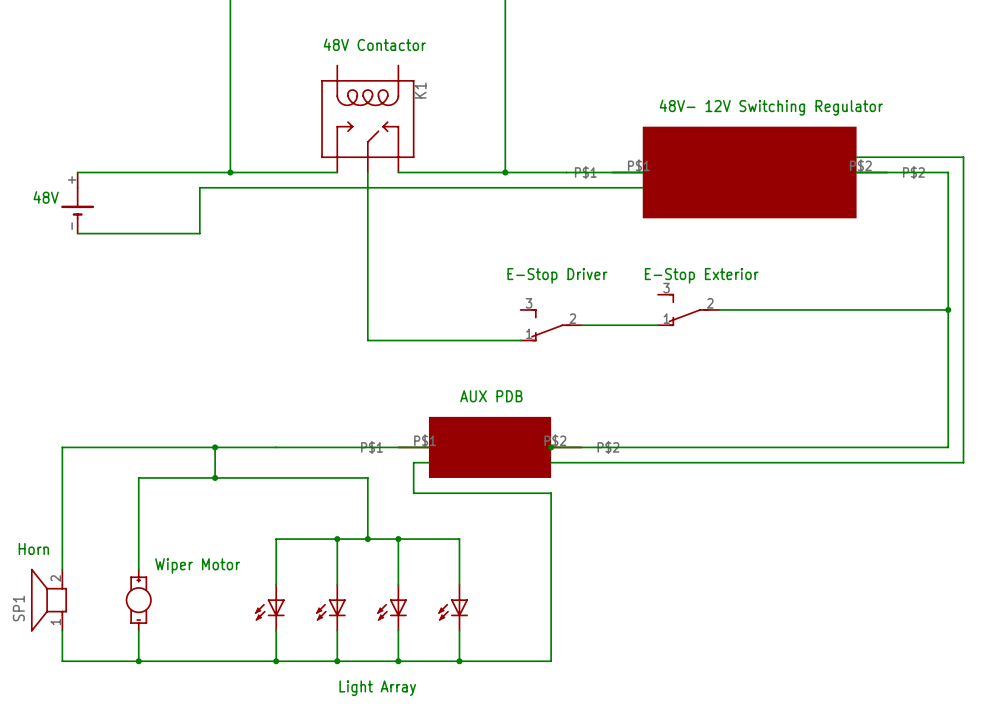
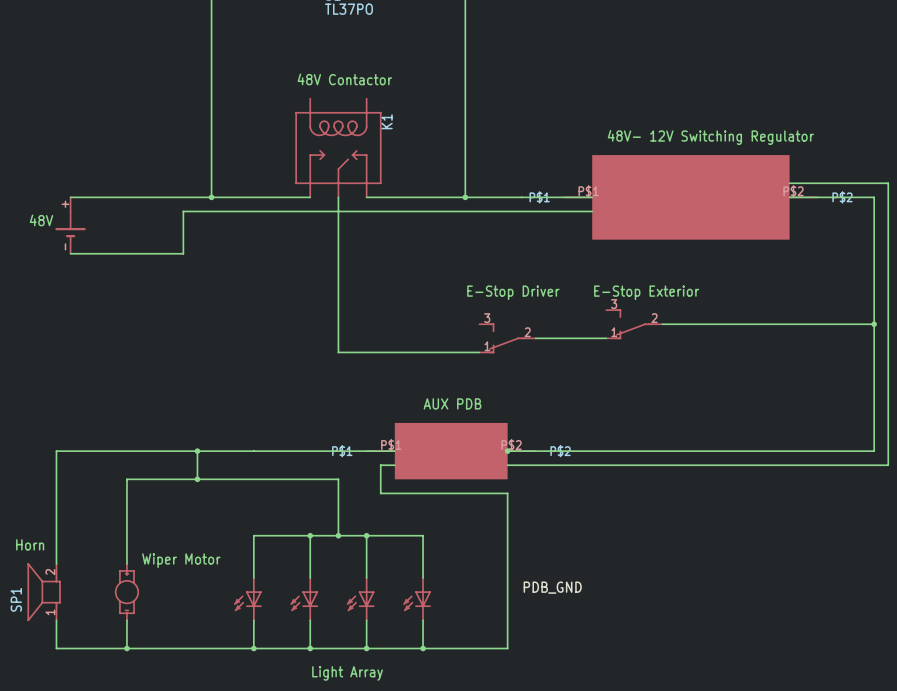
label: none -> PDB_GND (552, 587)

